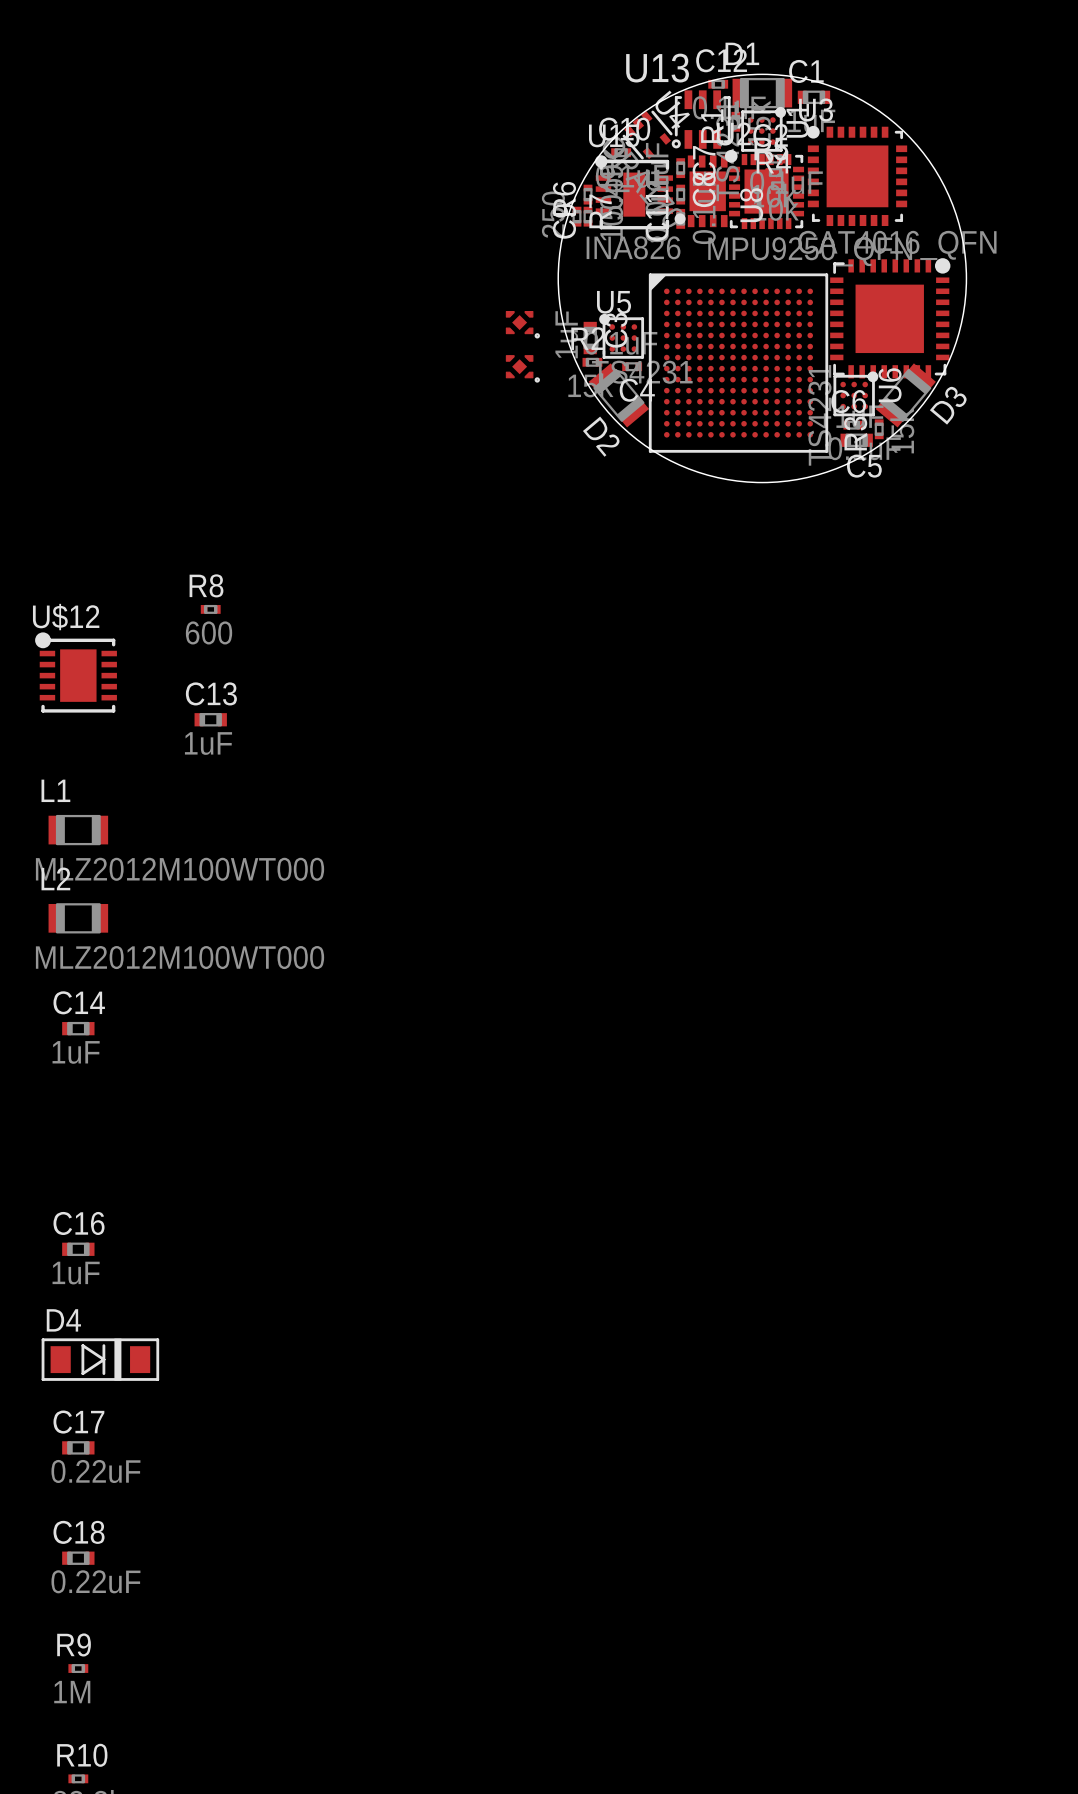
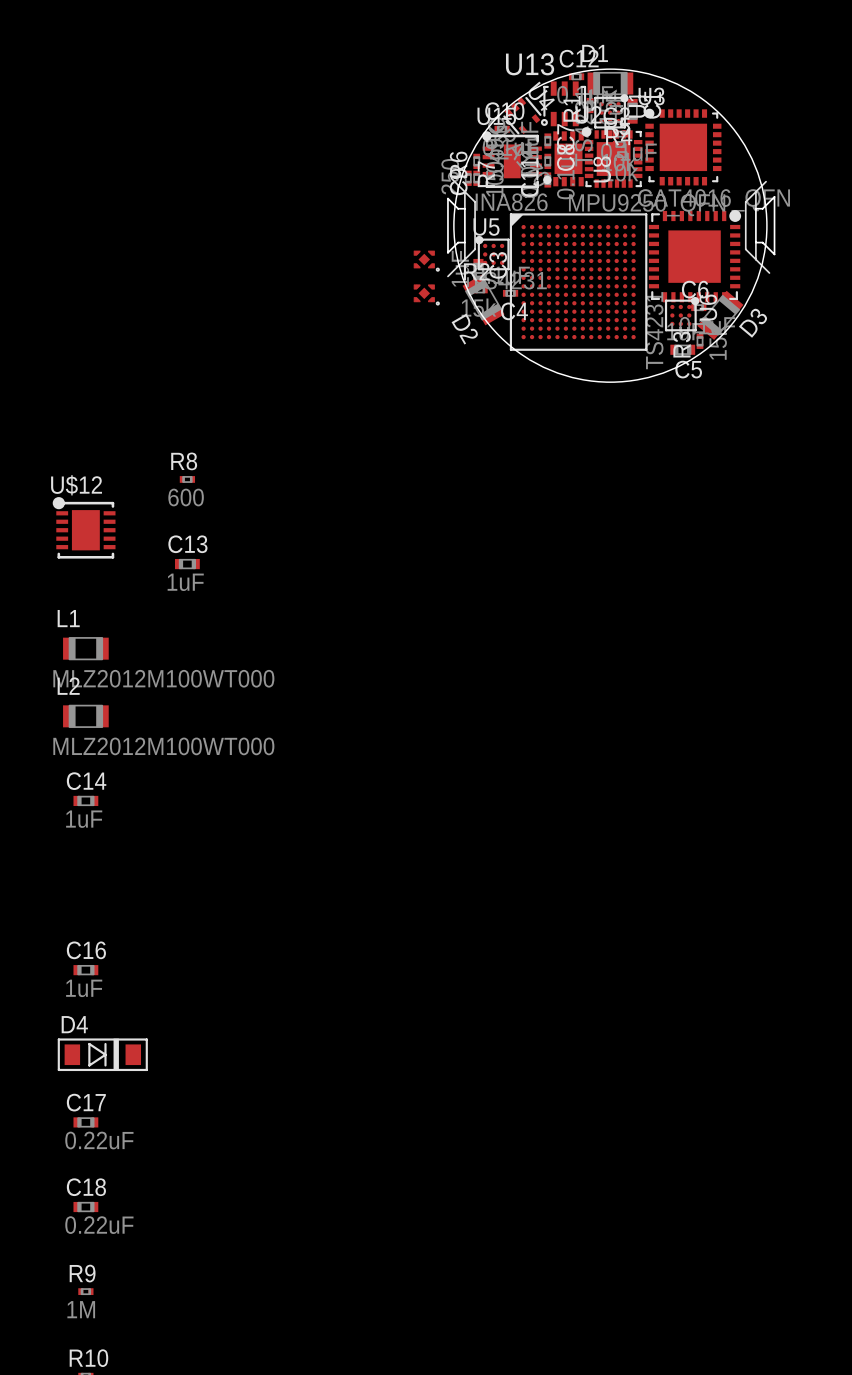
C1 rotation: 0° (813, 97) -> 90° clockwise (632, 111)
C1 position: (813, 97) -> (632, 111)
line: none -> (451, 178) (475, 201) (475, 249) (447, 276)
line: none -> (766, 181) (745, 201) (745, 249) (769, 273)
line: none -> (464, 191) (464, 208)
line: none -> (755, 191) (755, 208)
board edge: none -> (774, 196) (762, 208) (755, 208) (755, 242) (762, 242) (774, 254) (774, 196)
board edge: none -> (447, 198) (458, 208) (464, 208) (464, 242) (458, 242) (447, 252) (447, 198)
line: none -> (464, 242) (464, 259)
line: none -> (755, 242) (755, 259)
part position: (890, 318) -> (695, 256)
U5 position: (621, 336) -> (492, 253)
part position: (738, 363) -> (578, 282)
D2 rotation: 0° (618, 395) -> 10° clockwise (483, 300)
C6 position: (853, 425) -> (698, 307)

